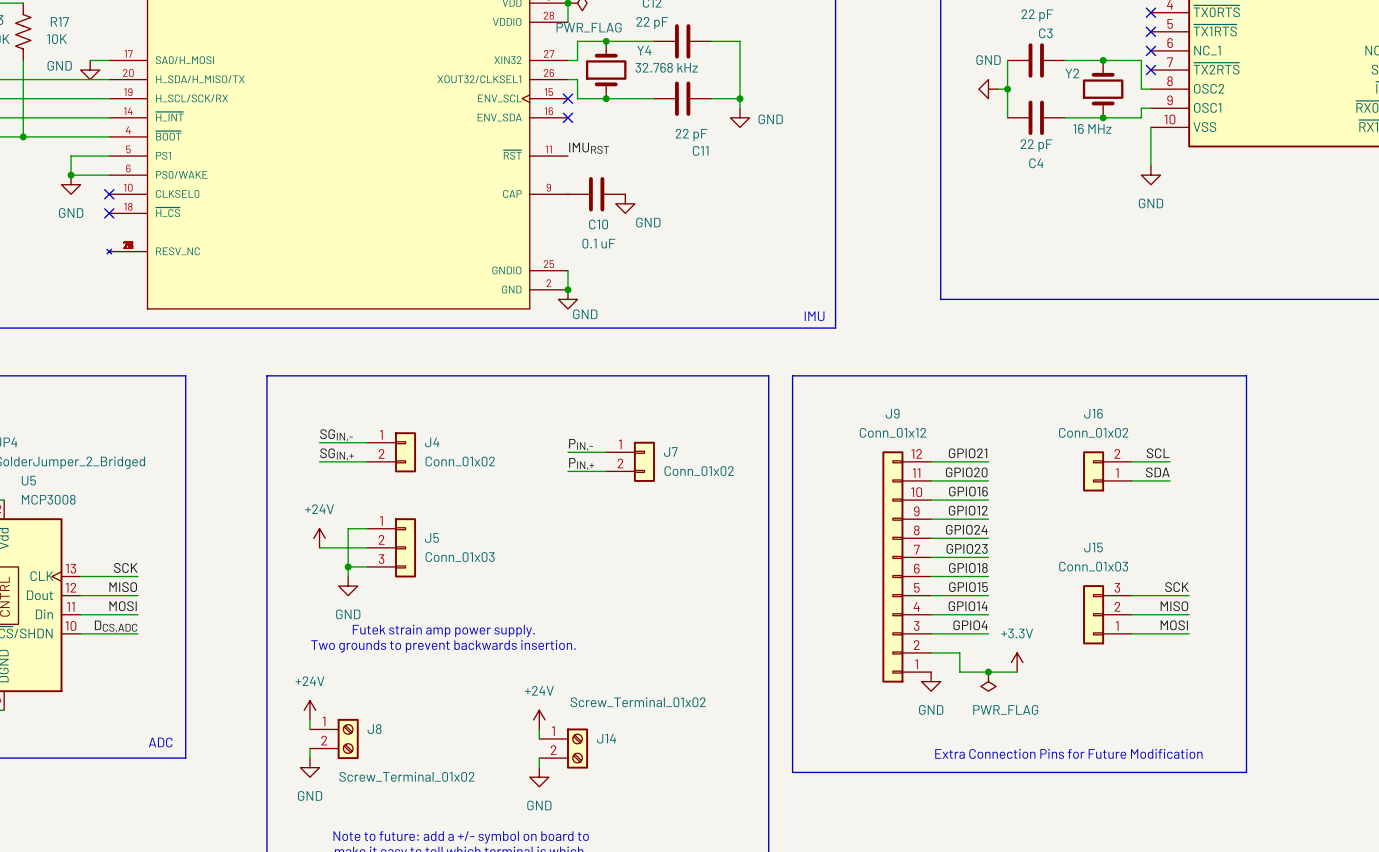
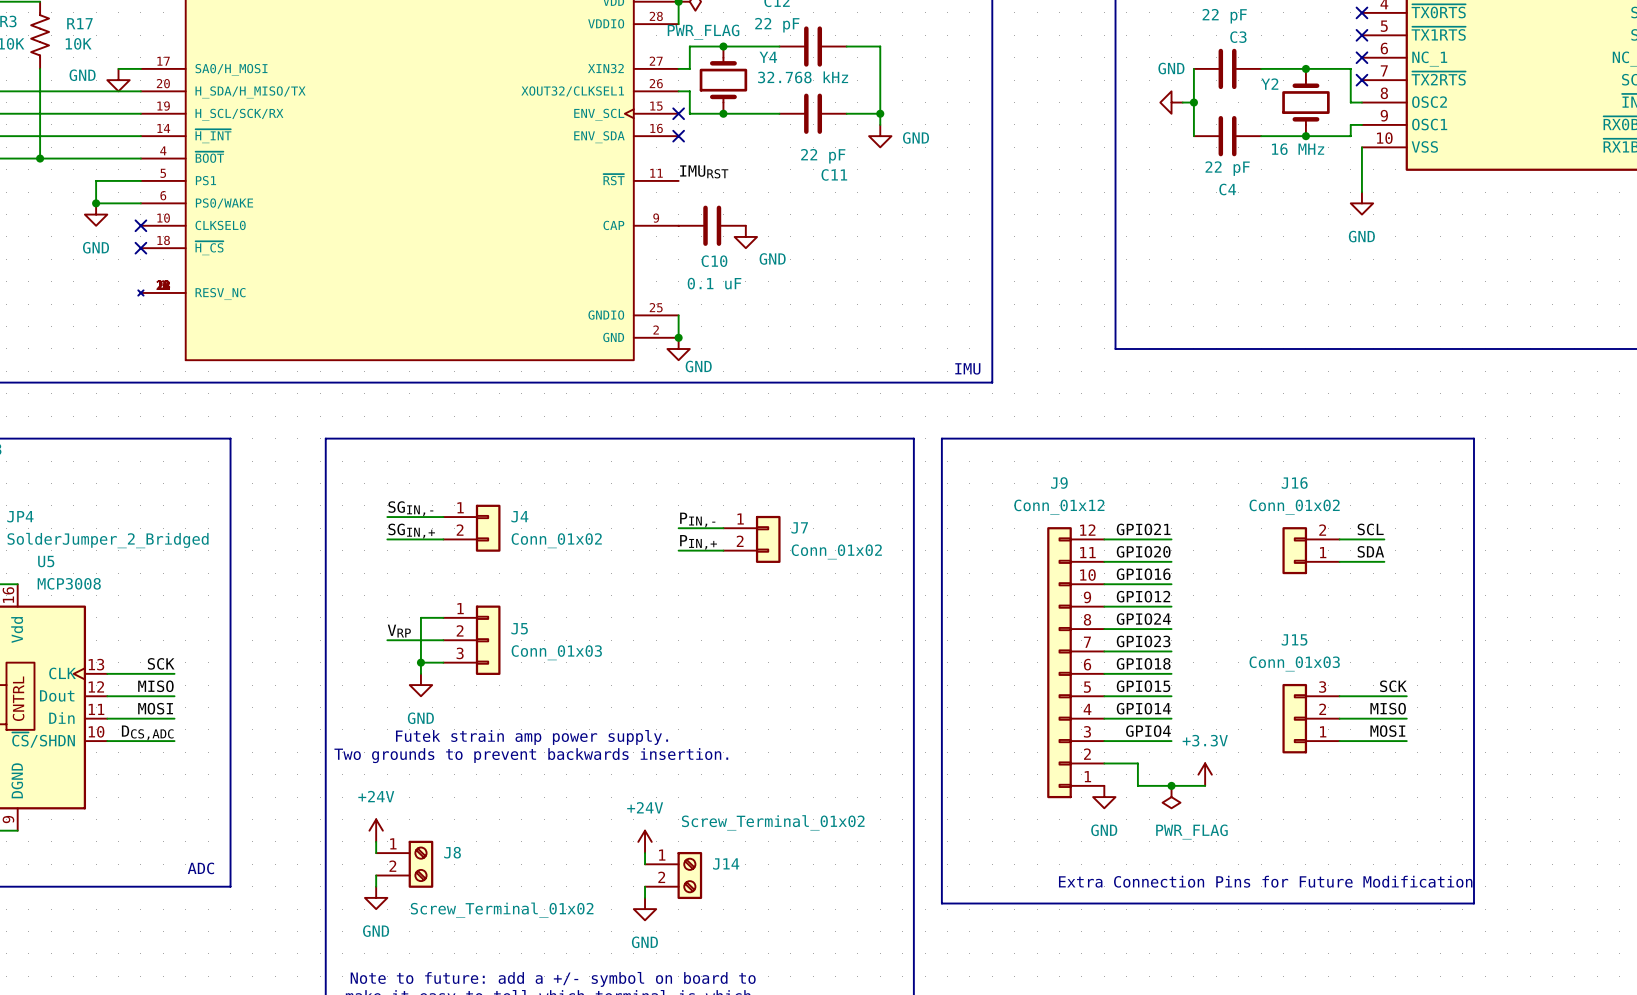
power symbol: +24V (319, 538) -> none
label: none -> VRP (399, 631)

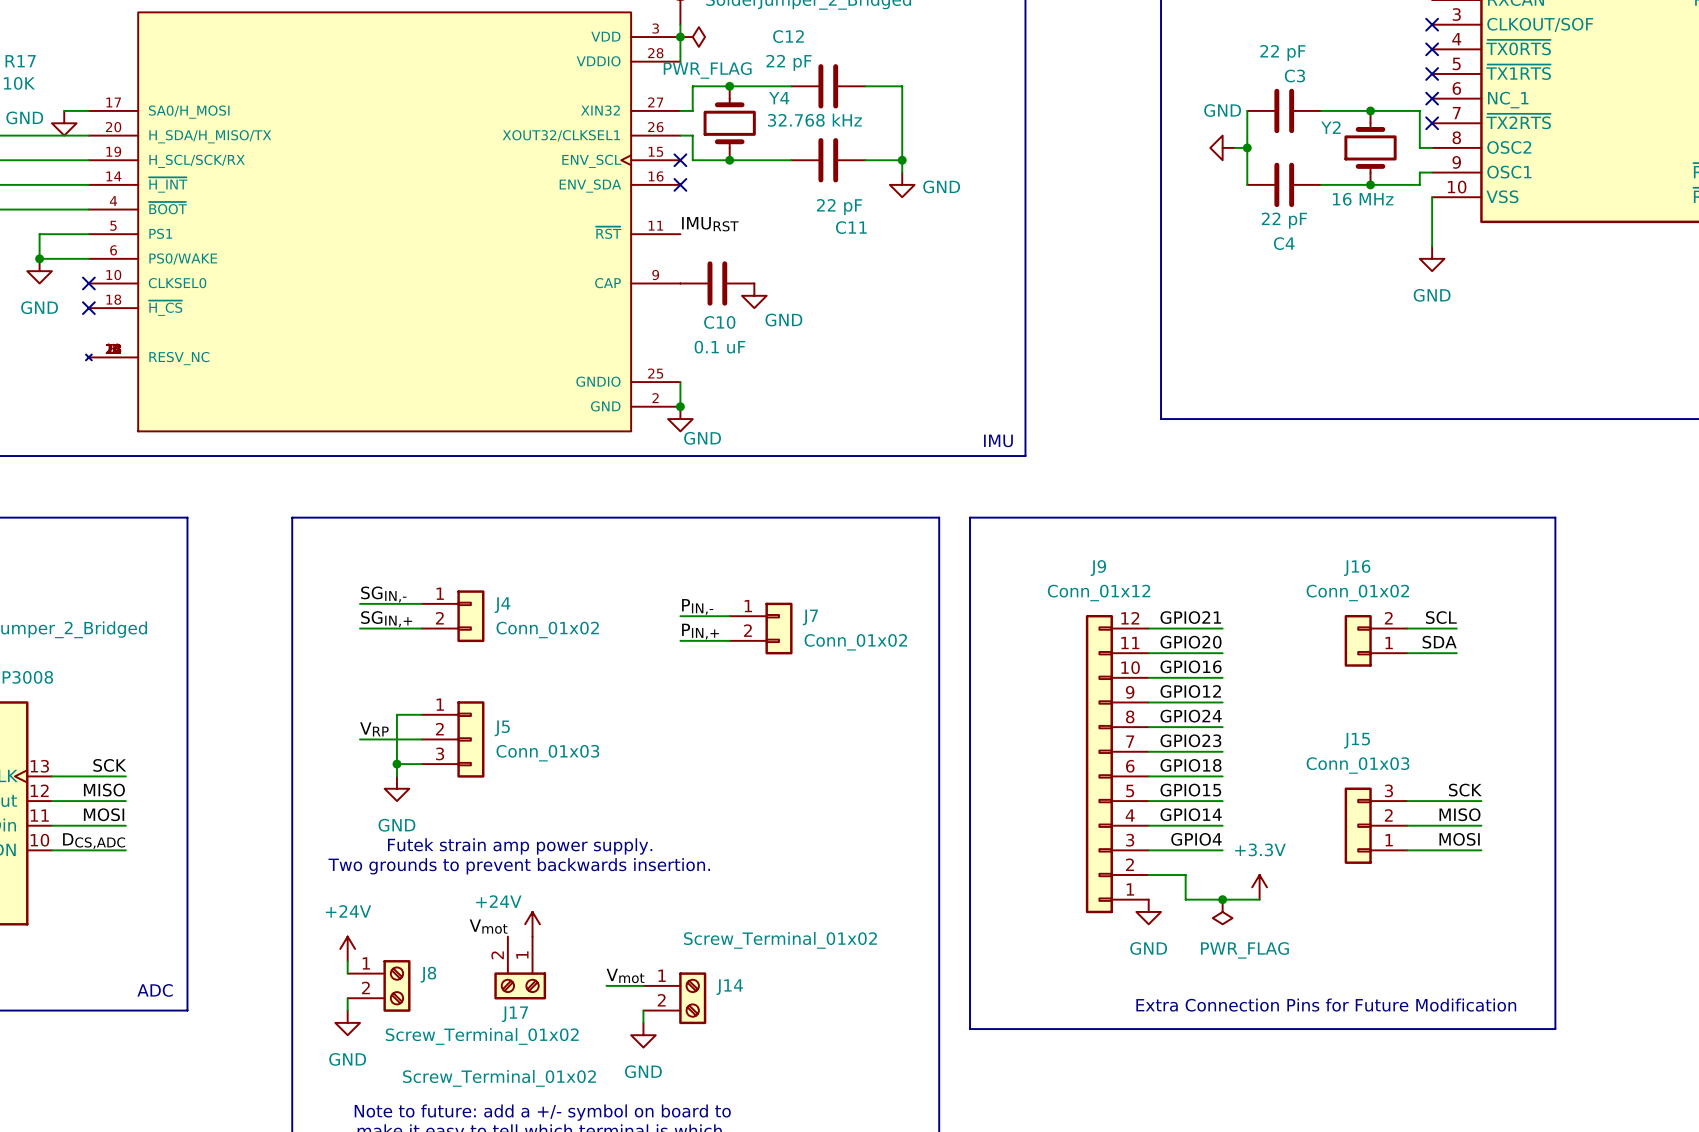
power symbol text position: +24V (645, 807) -> +24V (498, 901)
label: none -> Vmot (488, 926)
power symbol position: +24V (645, 841) -> +24V (532, 924)
J17: none -> Screw_Terminal_01x02 (520, 968)
wire: (645, 853) (645, 864) -> (606, 985) (643, 985)
label: none -> Vmot (625, 975)

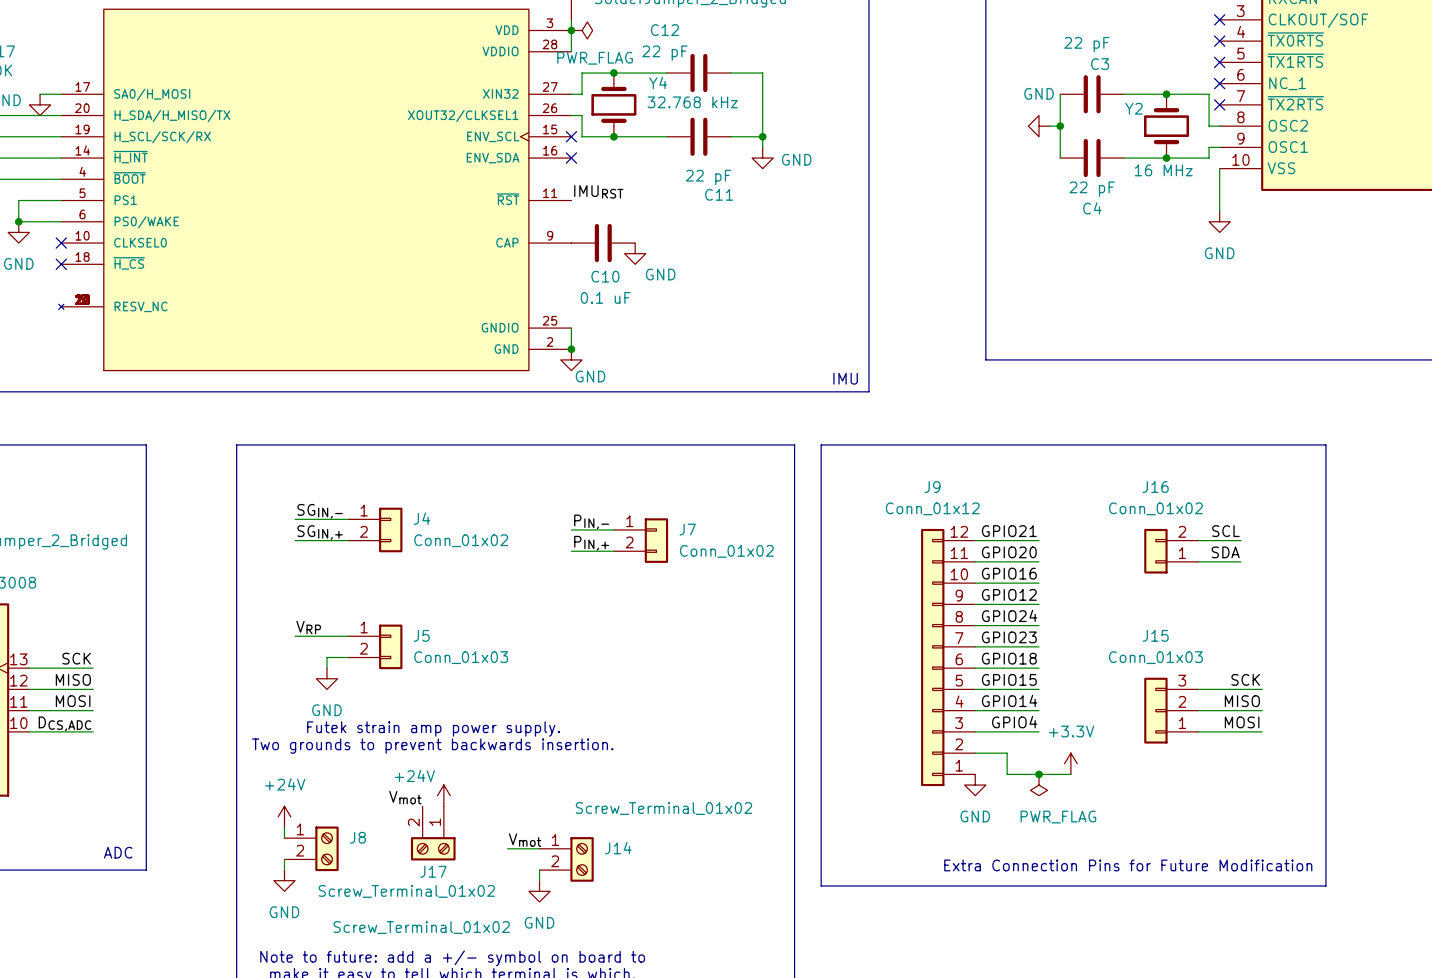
J5 symbol: [421, 701, 485, 778] -> [348, 624, 403, 670]
wire: (421, 714) (396, 714) (396, 764) -> none
junction: (396, 764) -> none

